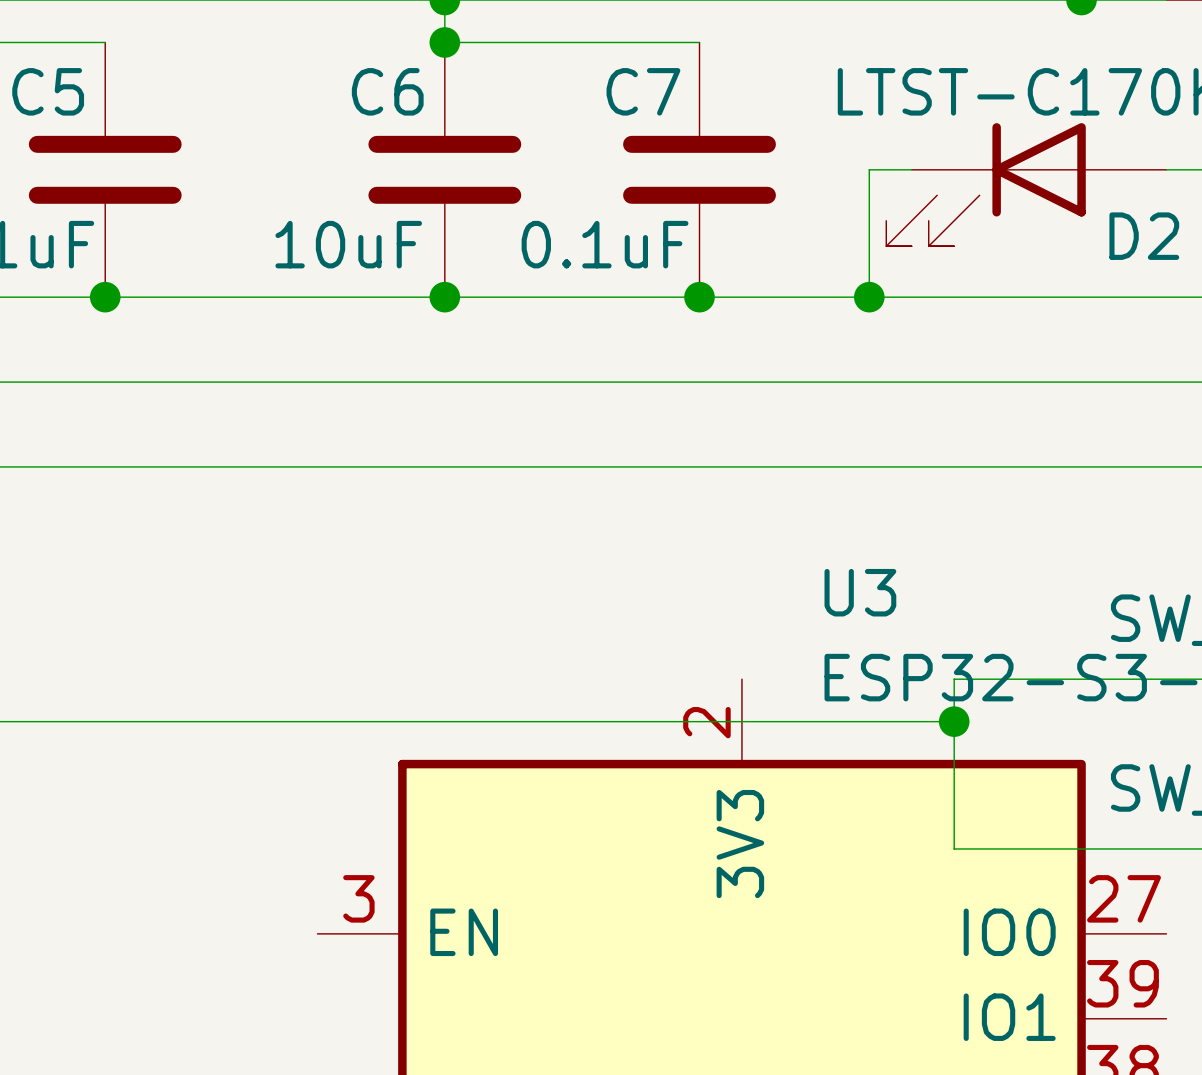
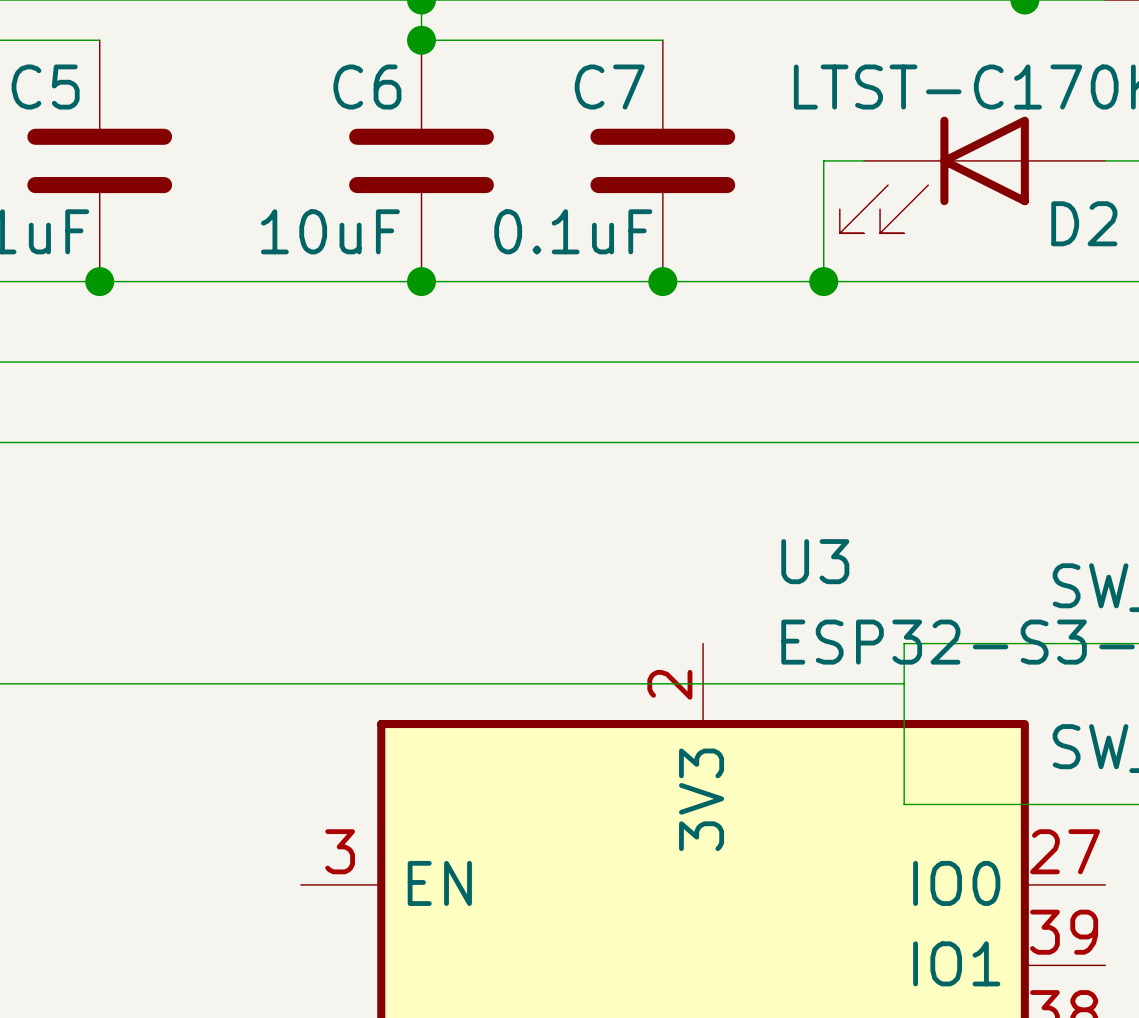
junction: (954, 721) -> none

